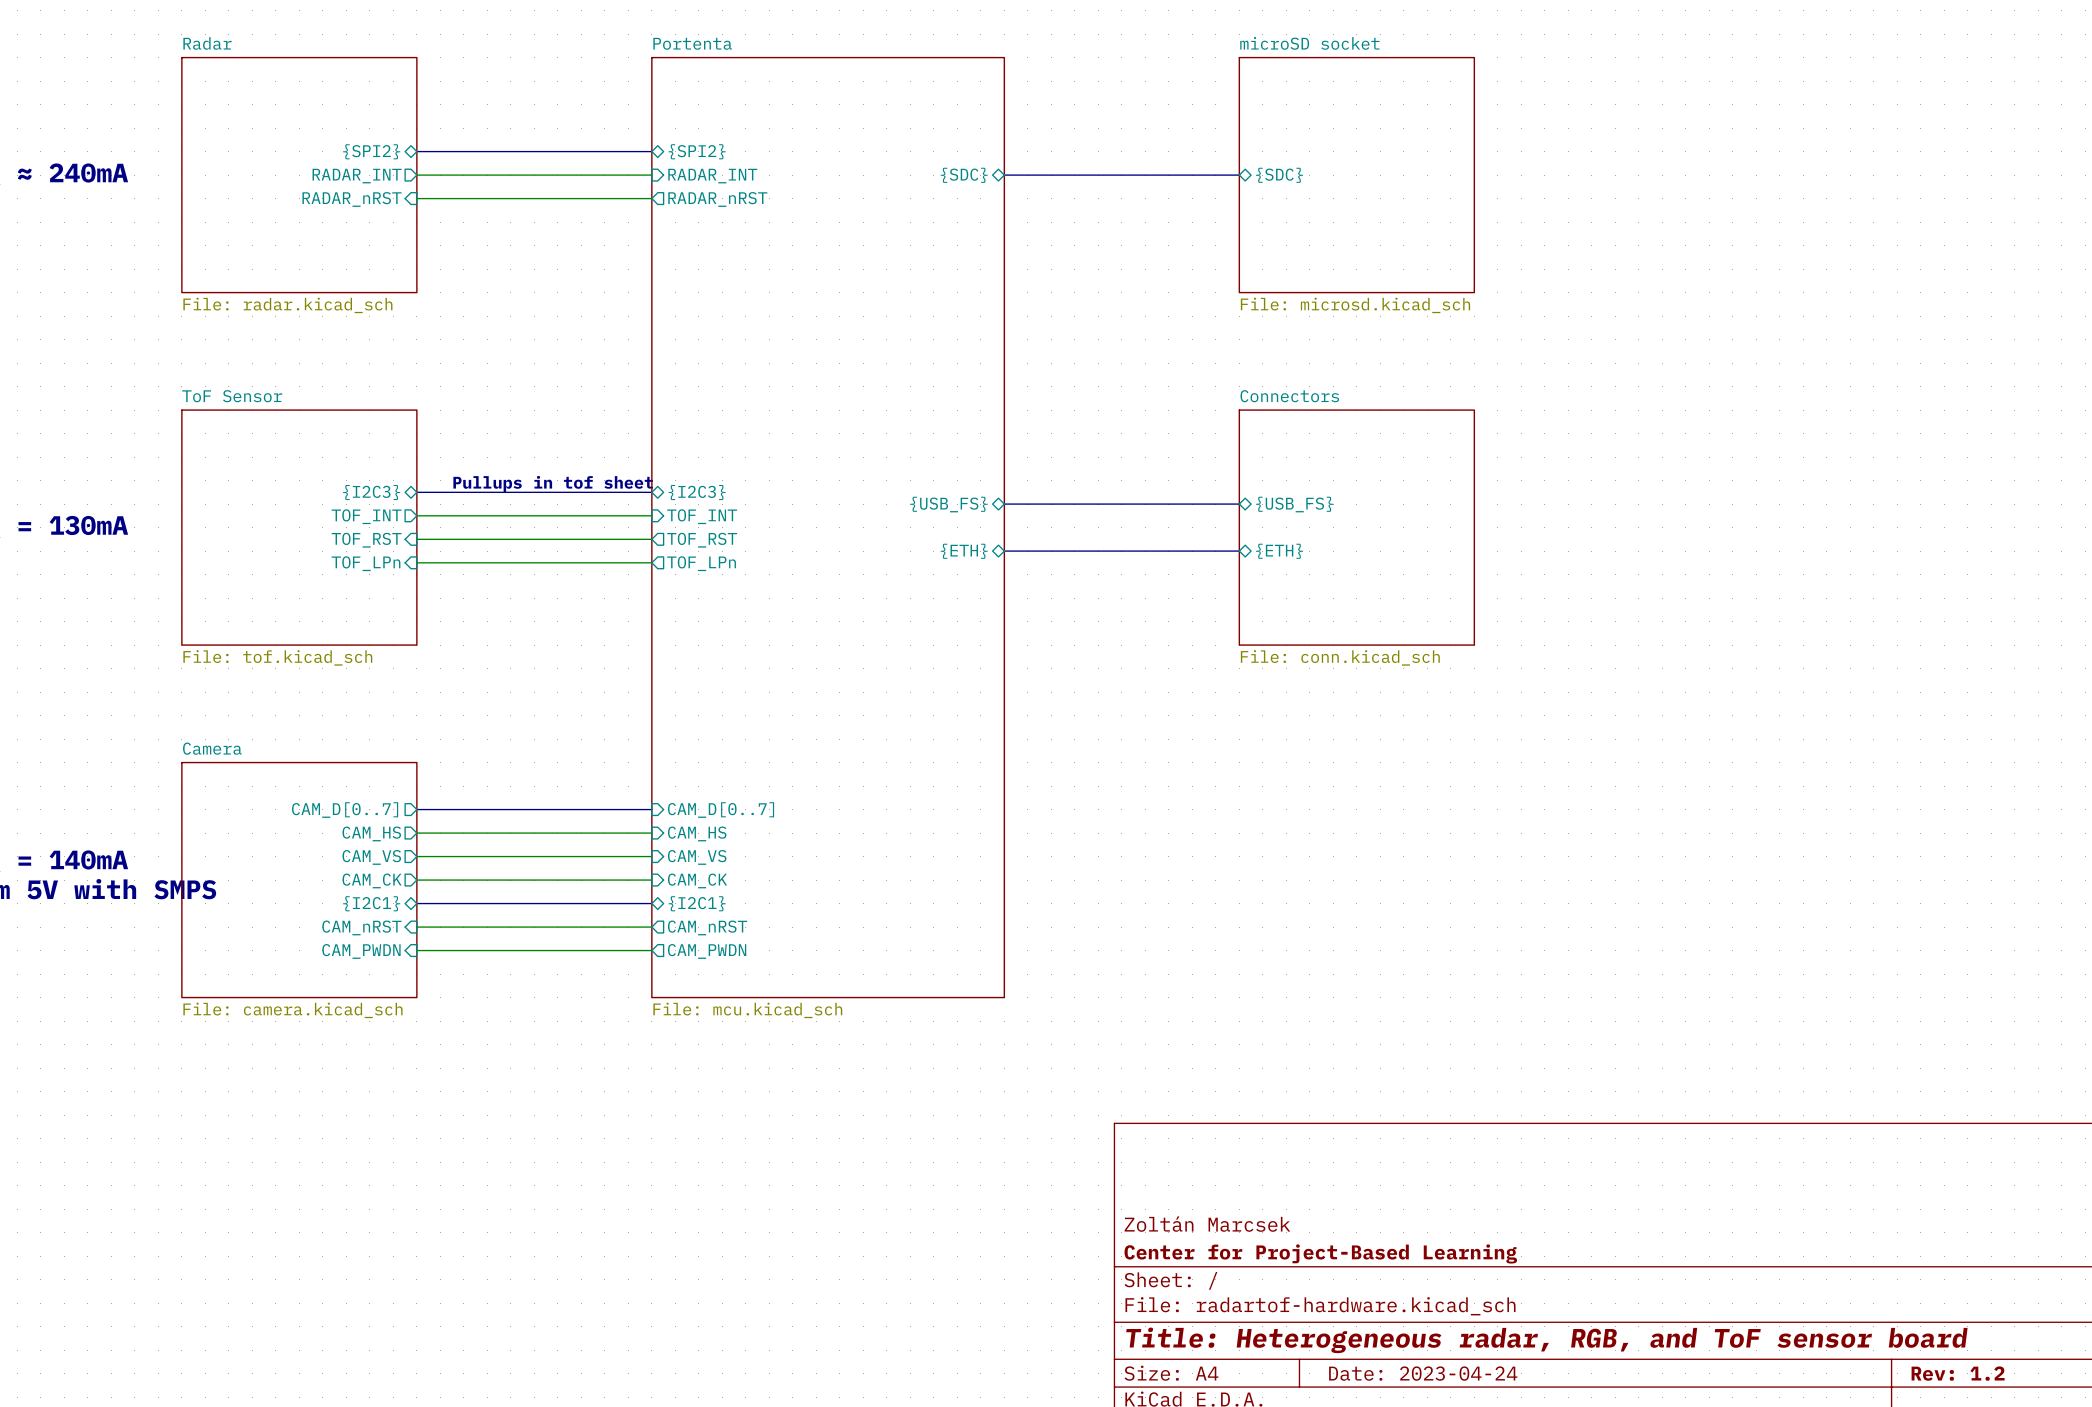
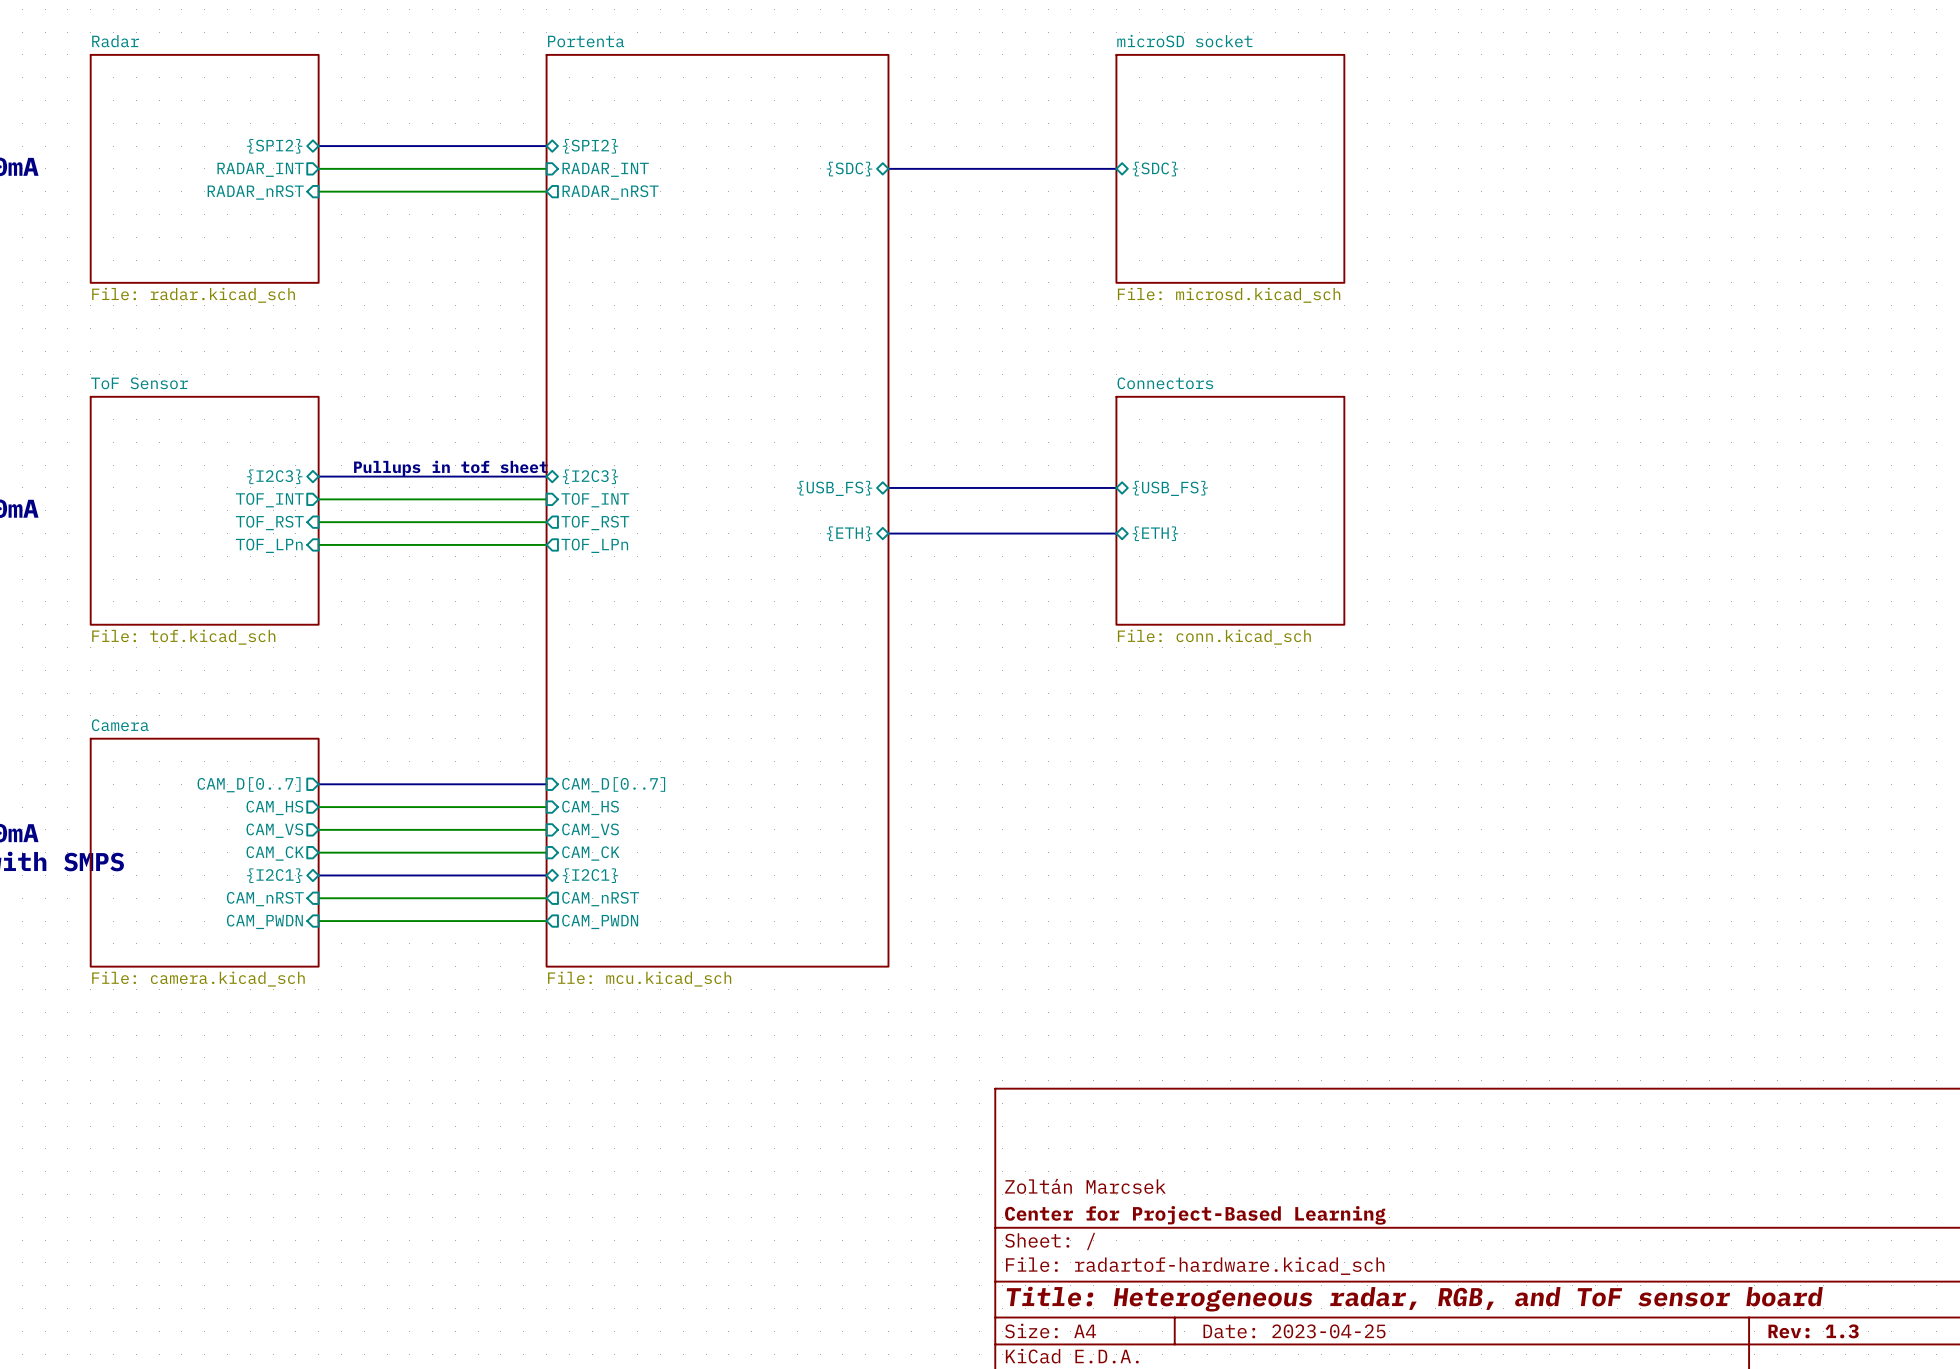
title block: Date: 2023-04-24 (1423, 1373) -> Date: 2023-04-25 (1294, 1331)
title block: Rev: 1.2 (1958, 1373) -> Rev: 1.3 (1813, 1331)

